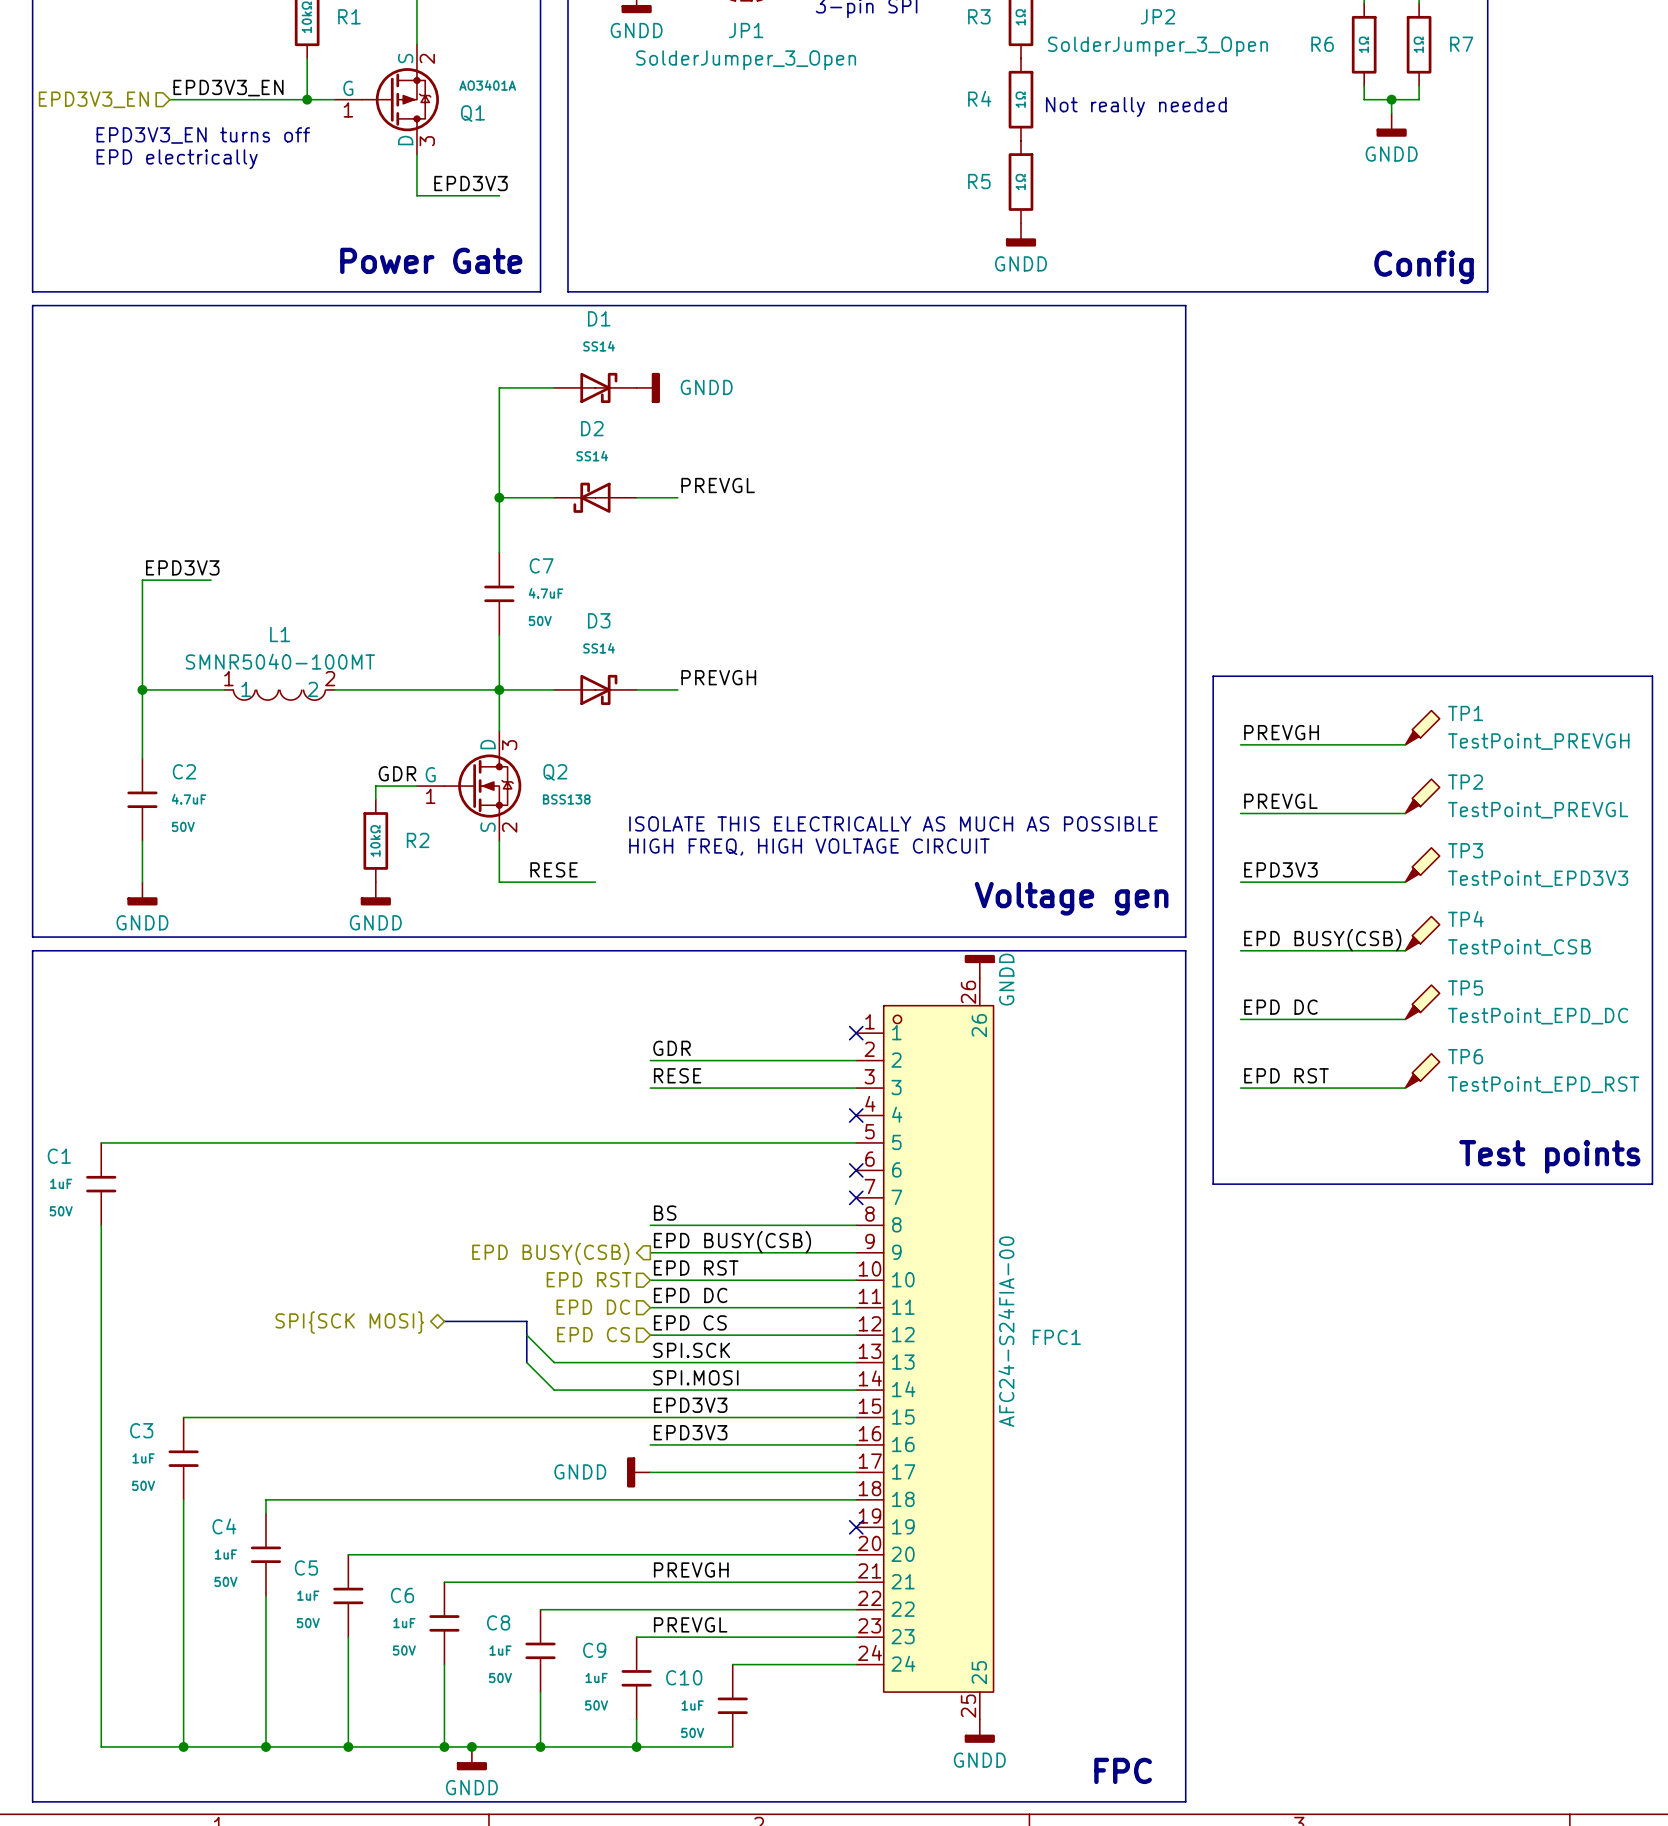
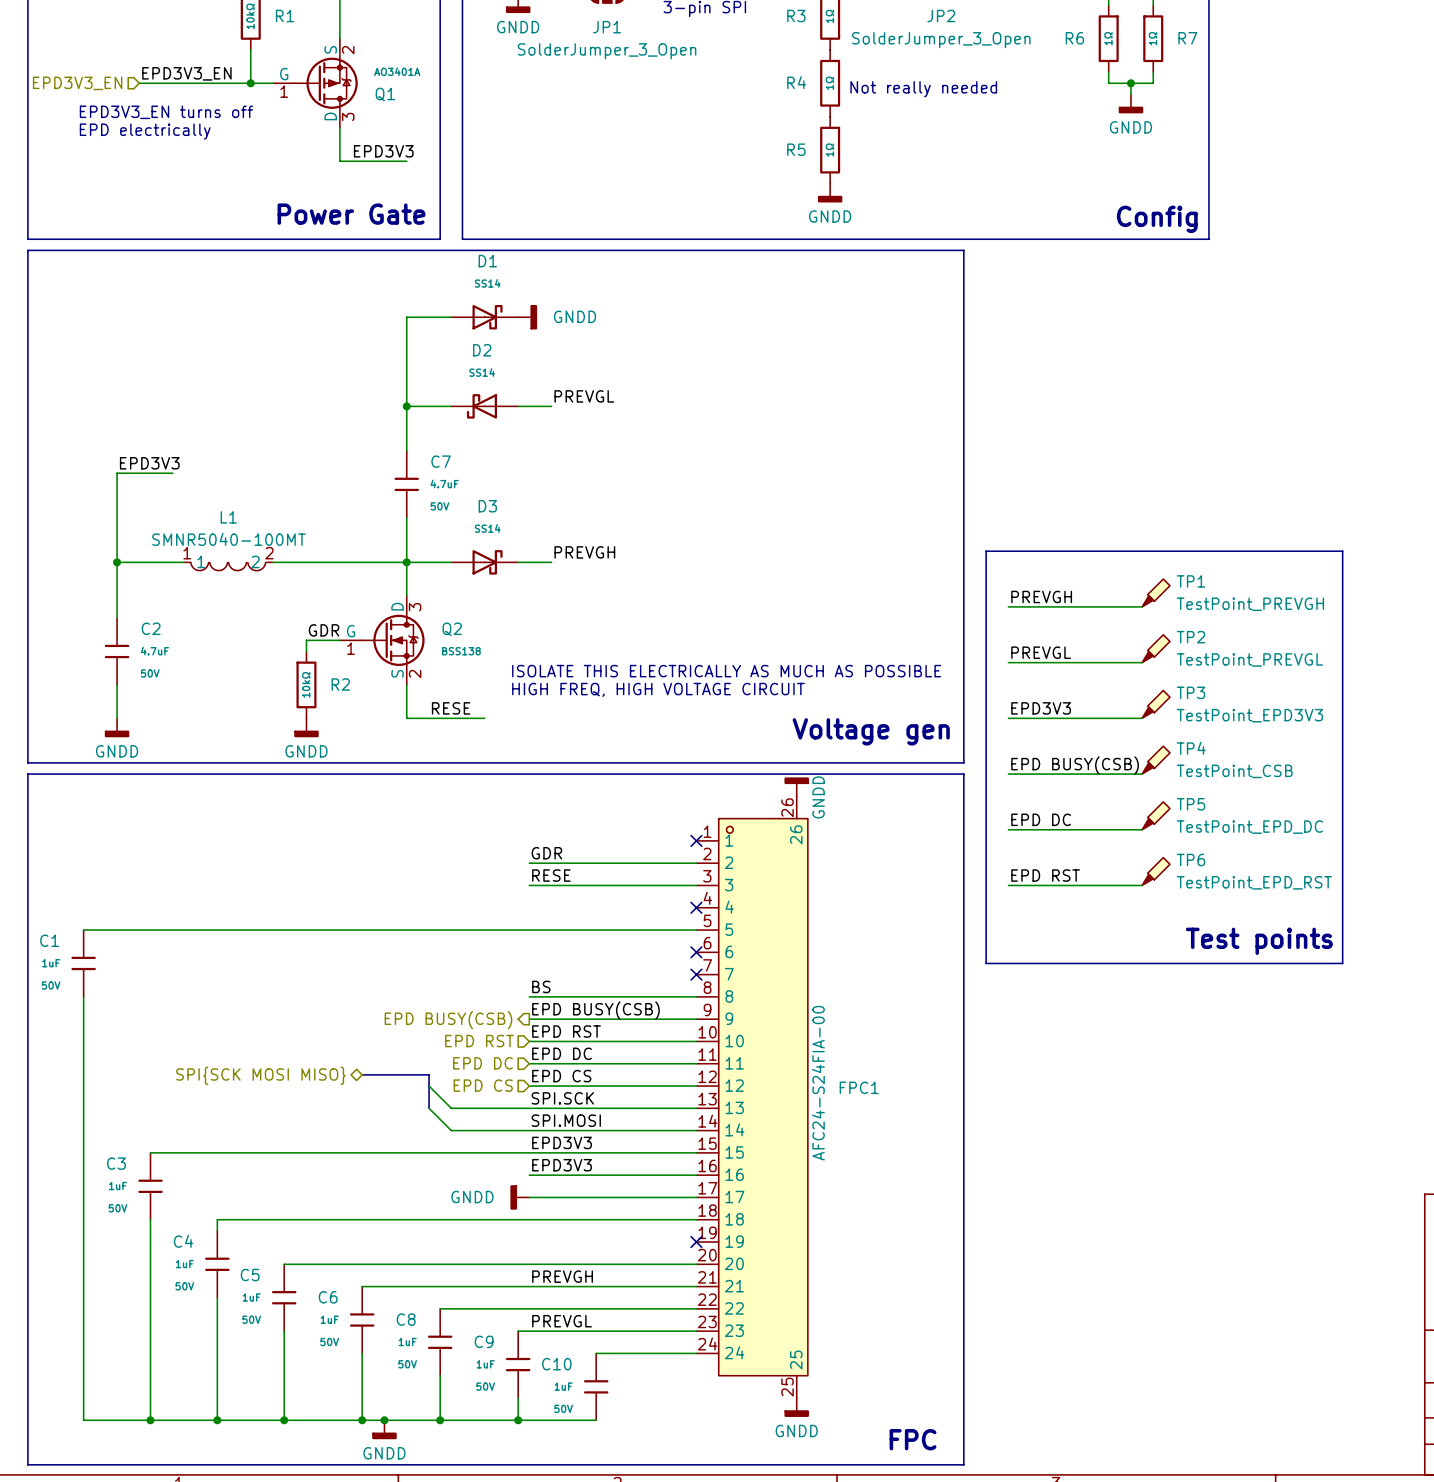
hierarchical label: SPI{SCK MOSI} (349, 1322) -> SPI{SCK MOSI MISO} (260, 1075)

